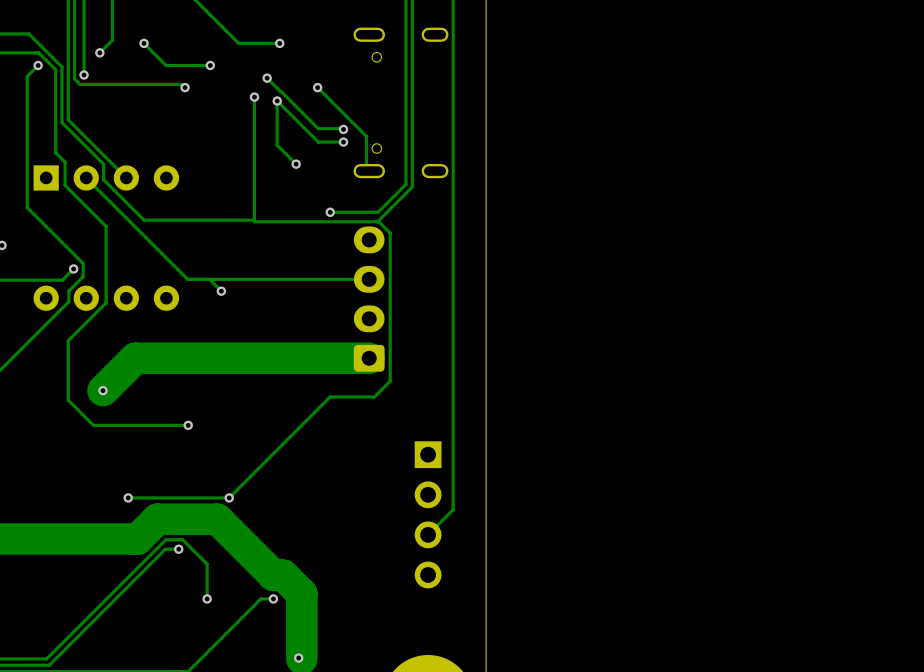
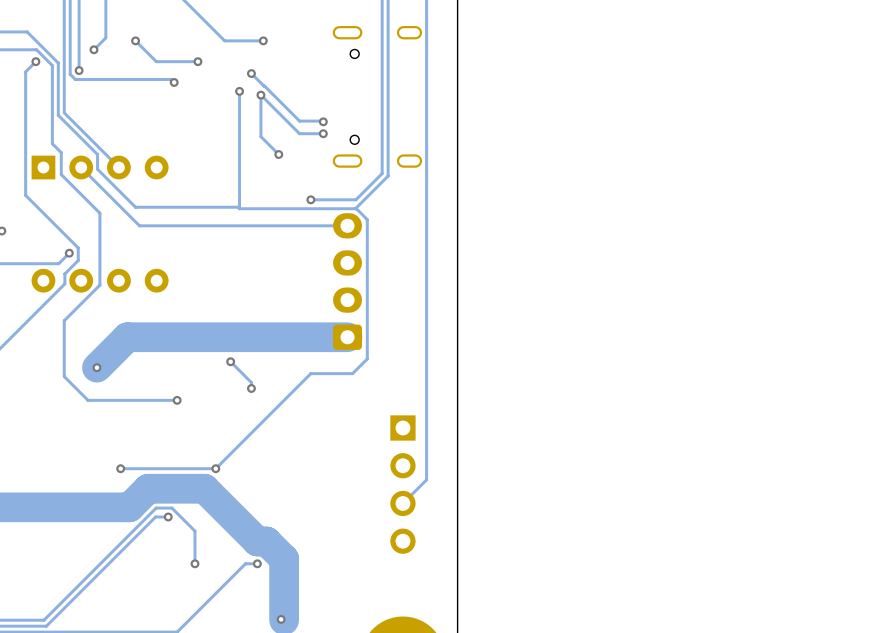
track: (317, 87) (366, 136) (366, 168) (369, 171) -> none
via: (317, 87) -> none
track: (148, 239) (187, 279) (369, 279) -> (139, 225) (347, 225)
track: (209, 279) (221, 291) -> none
via: (221, 291) -> none
track: none -> (230, 361) (251, 382) (251, 388)
via: none -> (230, 361)
via: none -> (251, 388)

